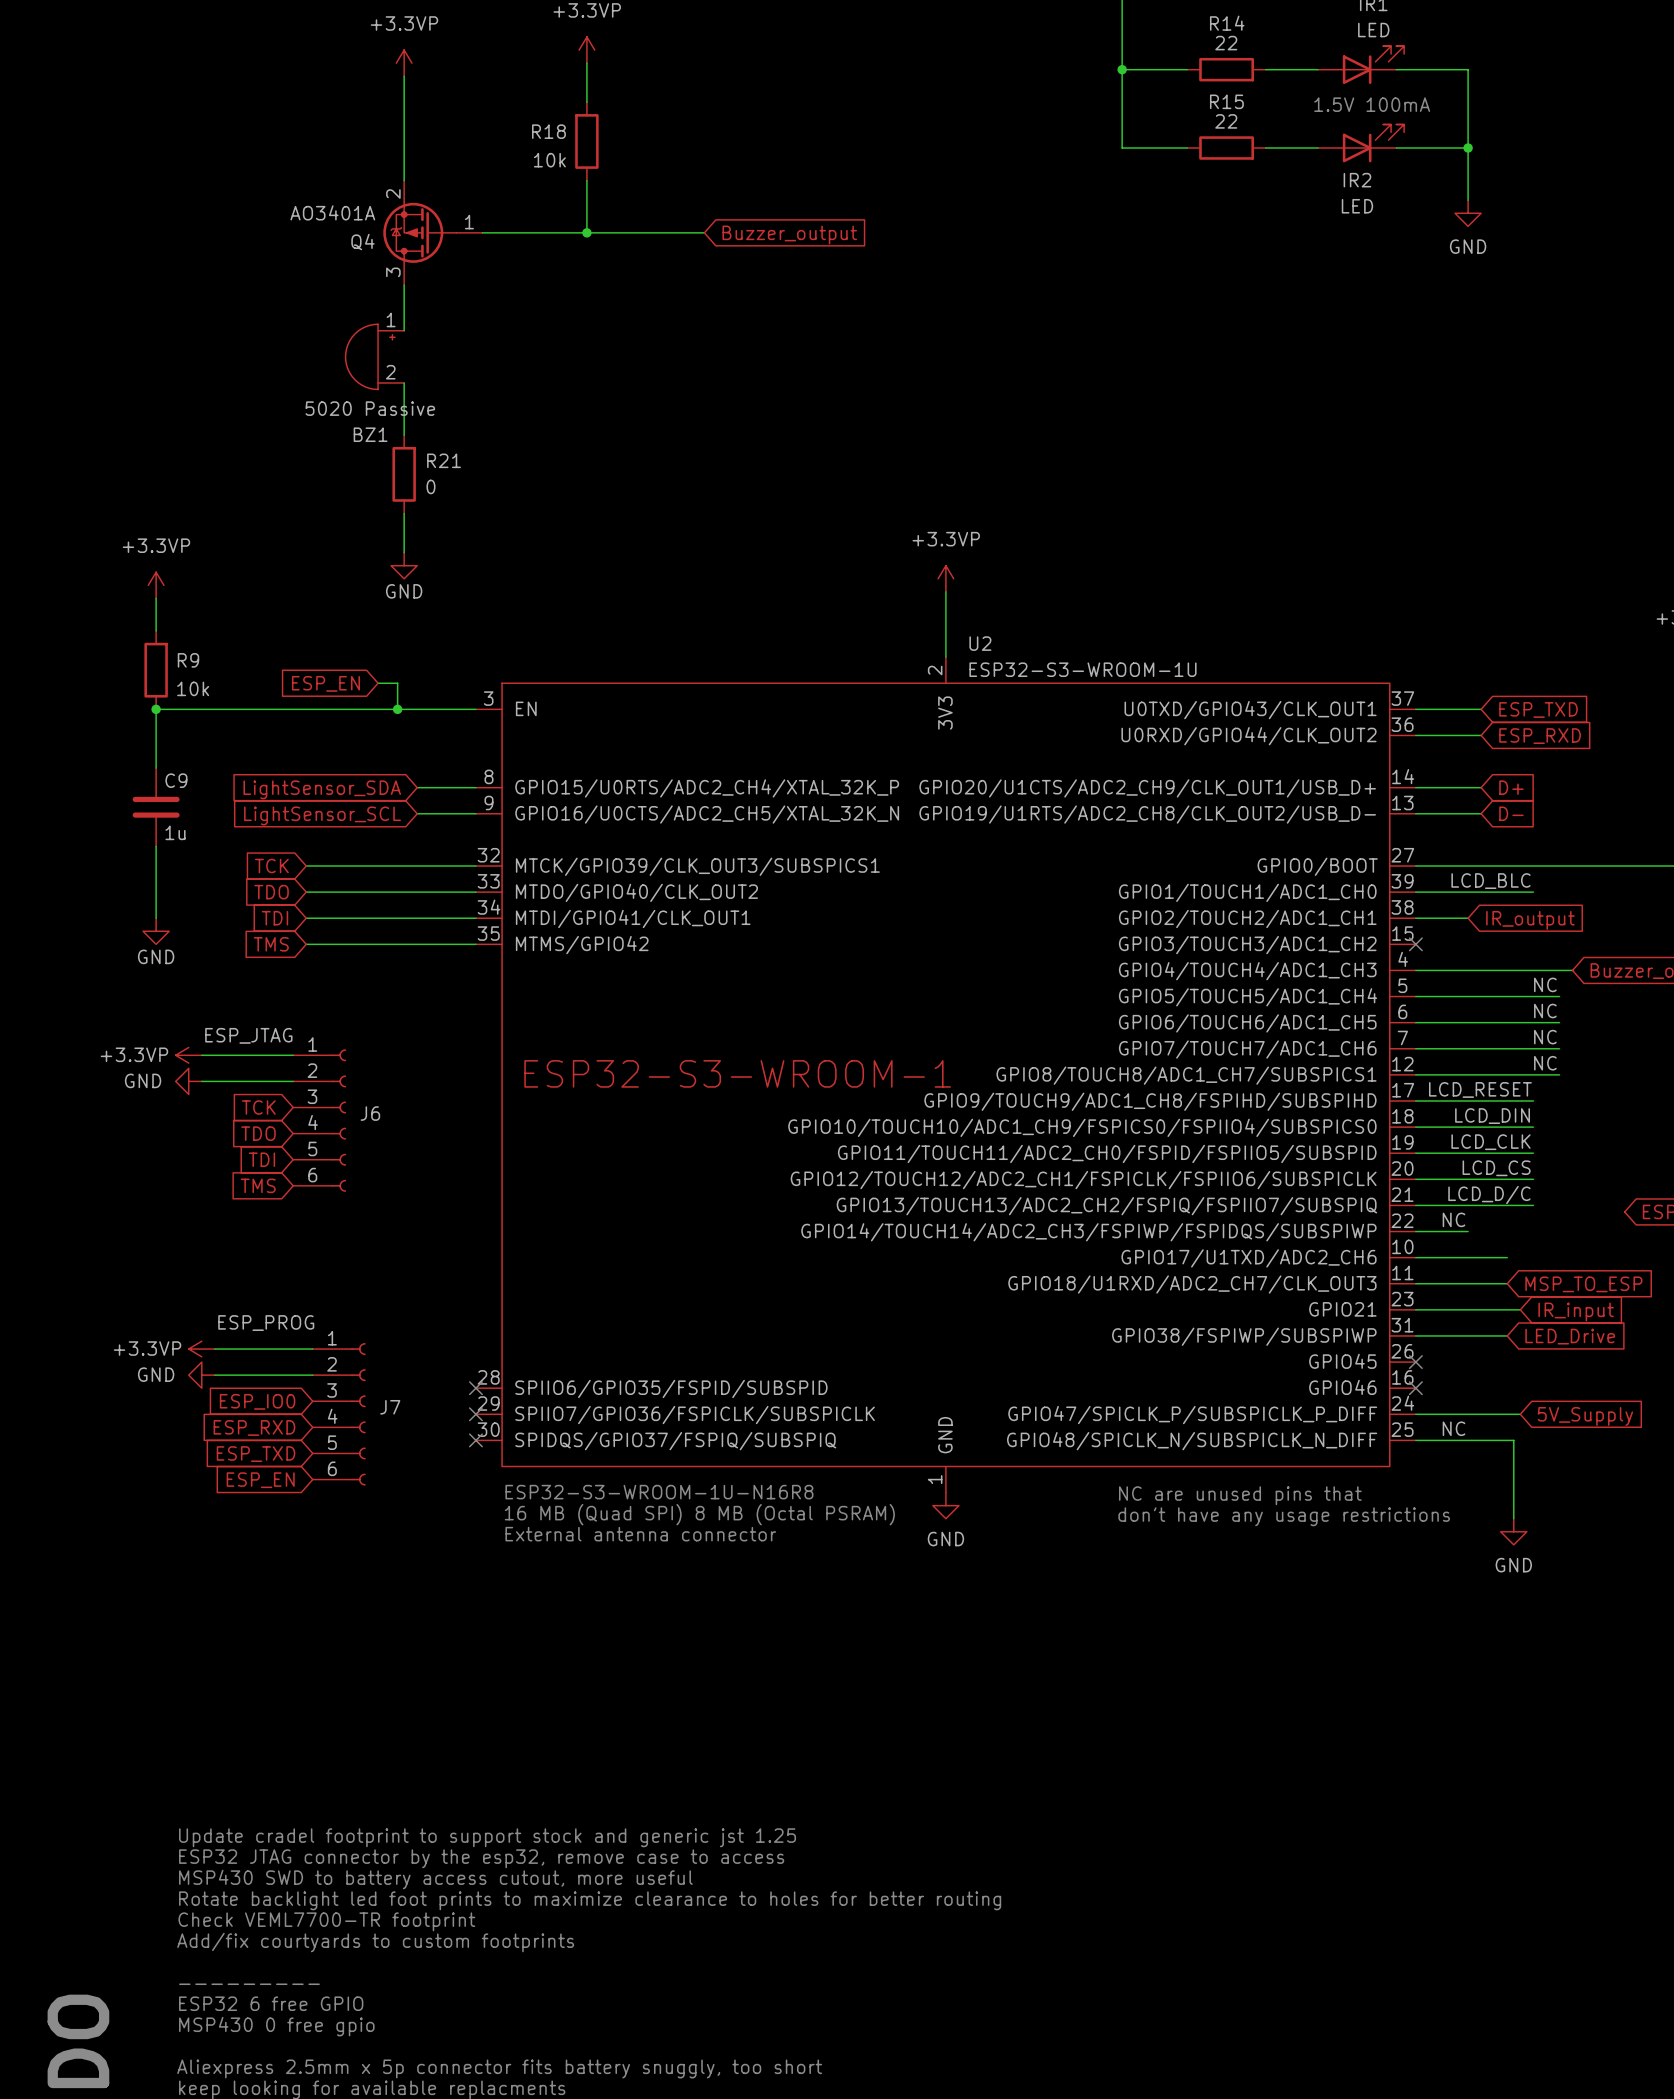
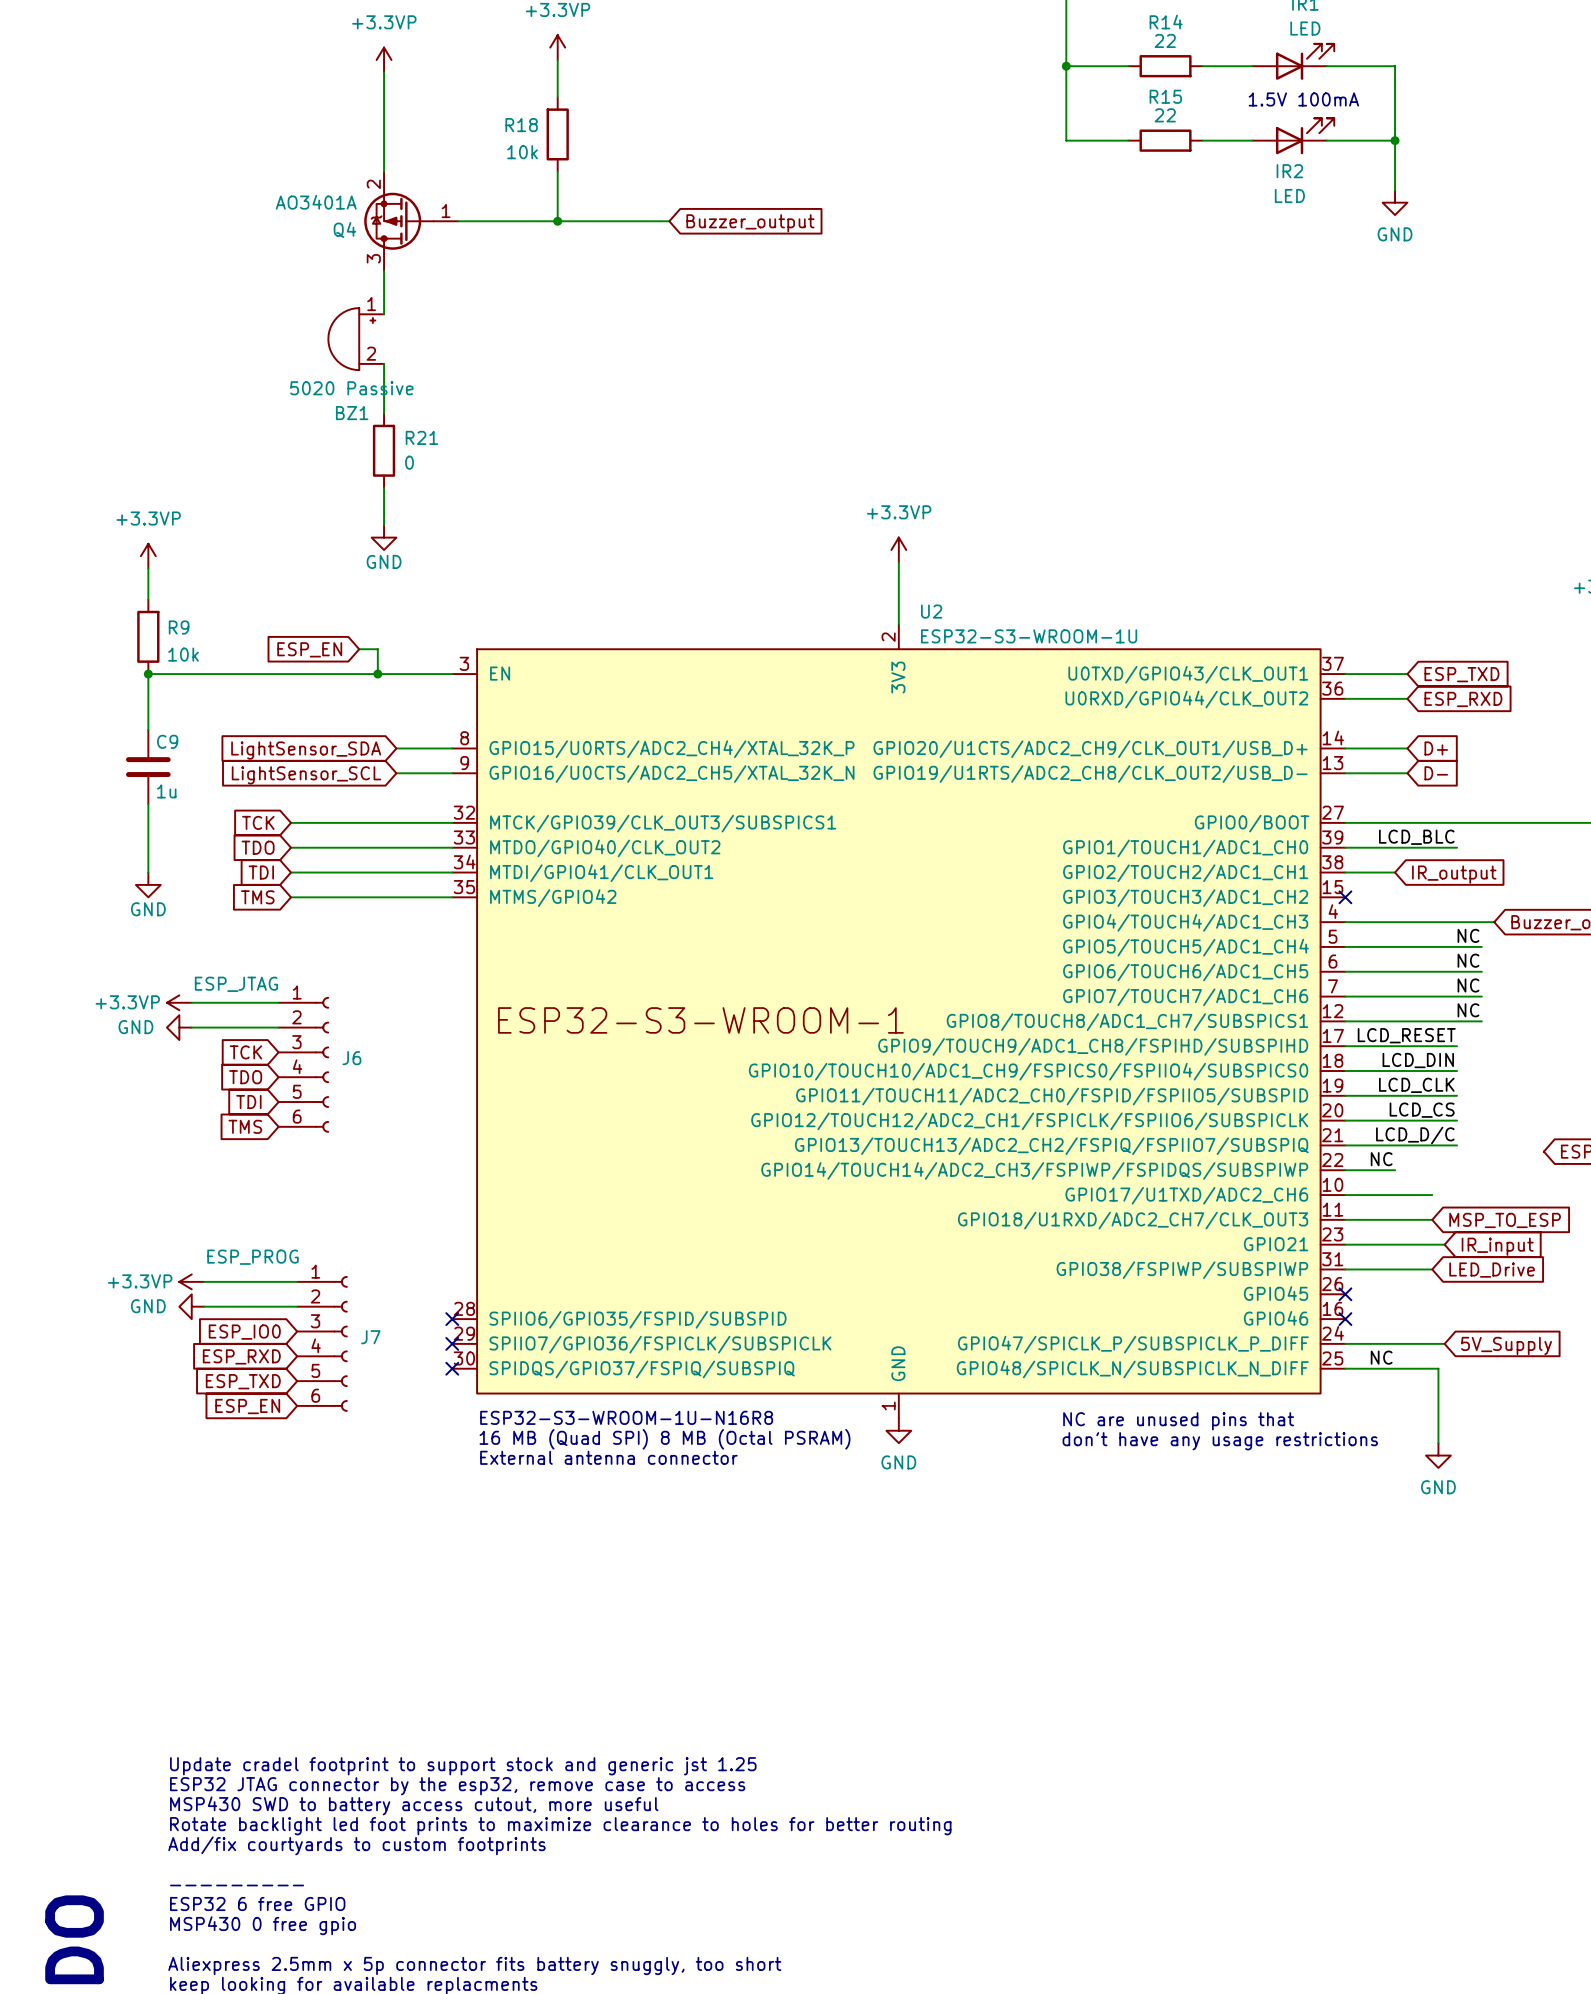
text: Update cradel footprint to support stock and generic jst 1.25 (487, 1837) -> none
text: ESP32 JTAG connector by the esp32, remove case to access (481, 1858) -> Update cradel footprint to support stock and generic jst 1.25 (463, 1766)
text: MSP430 SWD to battery access cutout, more useful (435, 1879) -> ESP32 JTAG connector by the esp32, remove case to access (457, 1786)
text: Rotate backlight led foot prints to maximize clearance to holes for better routing (590, 1900) -> MSP430 SWD to battery access cutout, more useful (414, 1805)
text: Check VEML7700-TR footprint (326, 1921) -> Rotate backlight led foot prints to maximize clearance to holes for better routing (560, 1826)

